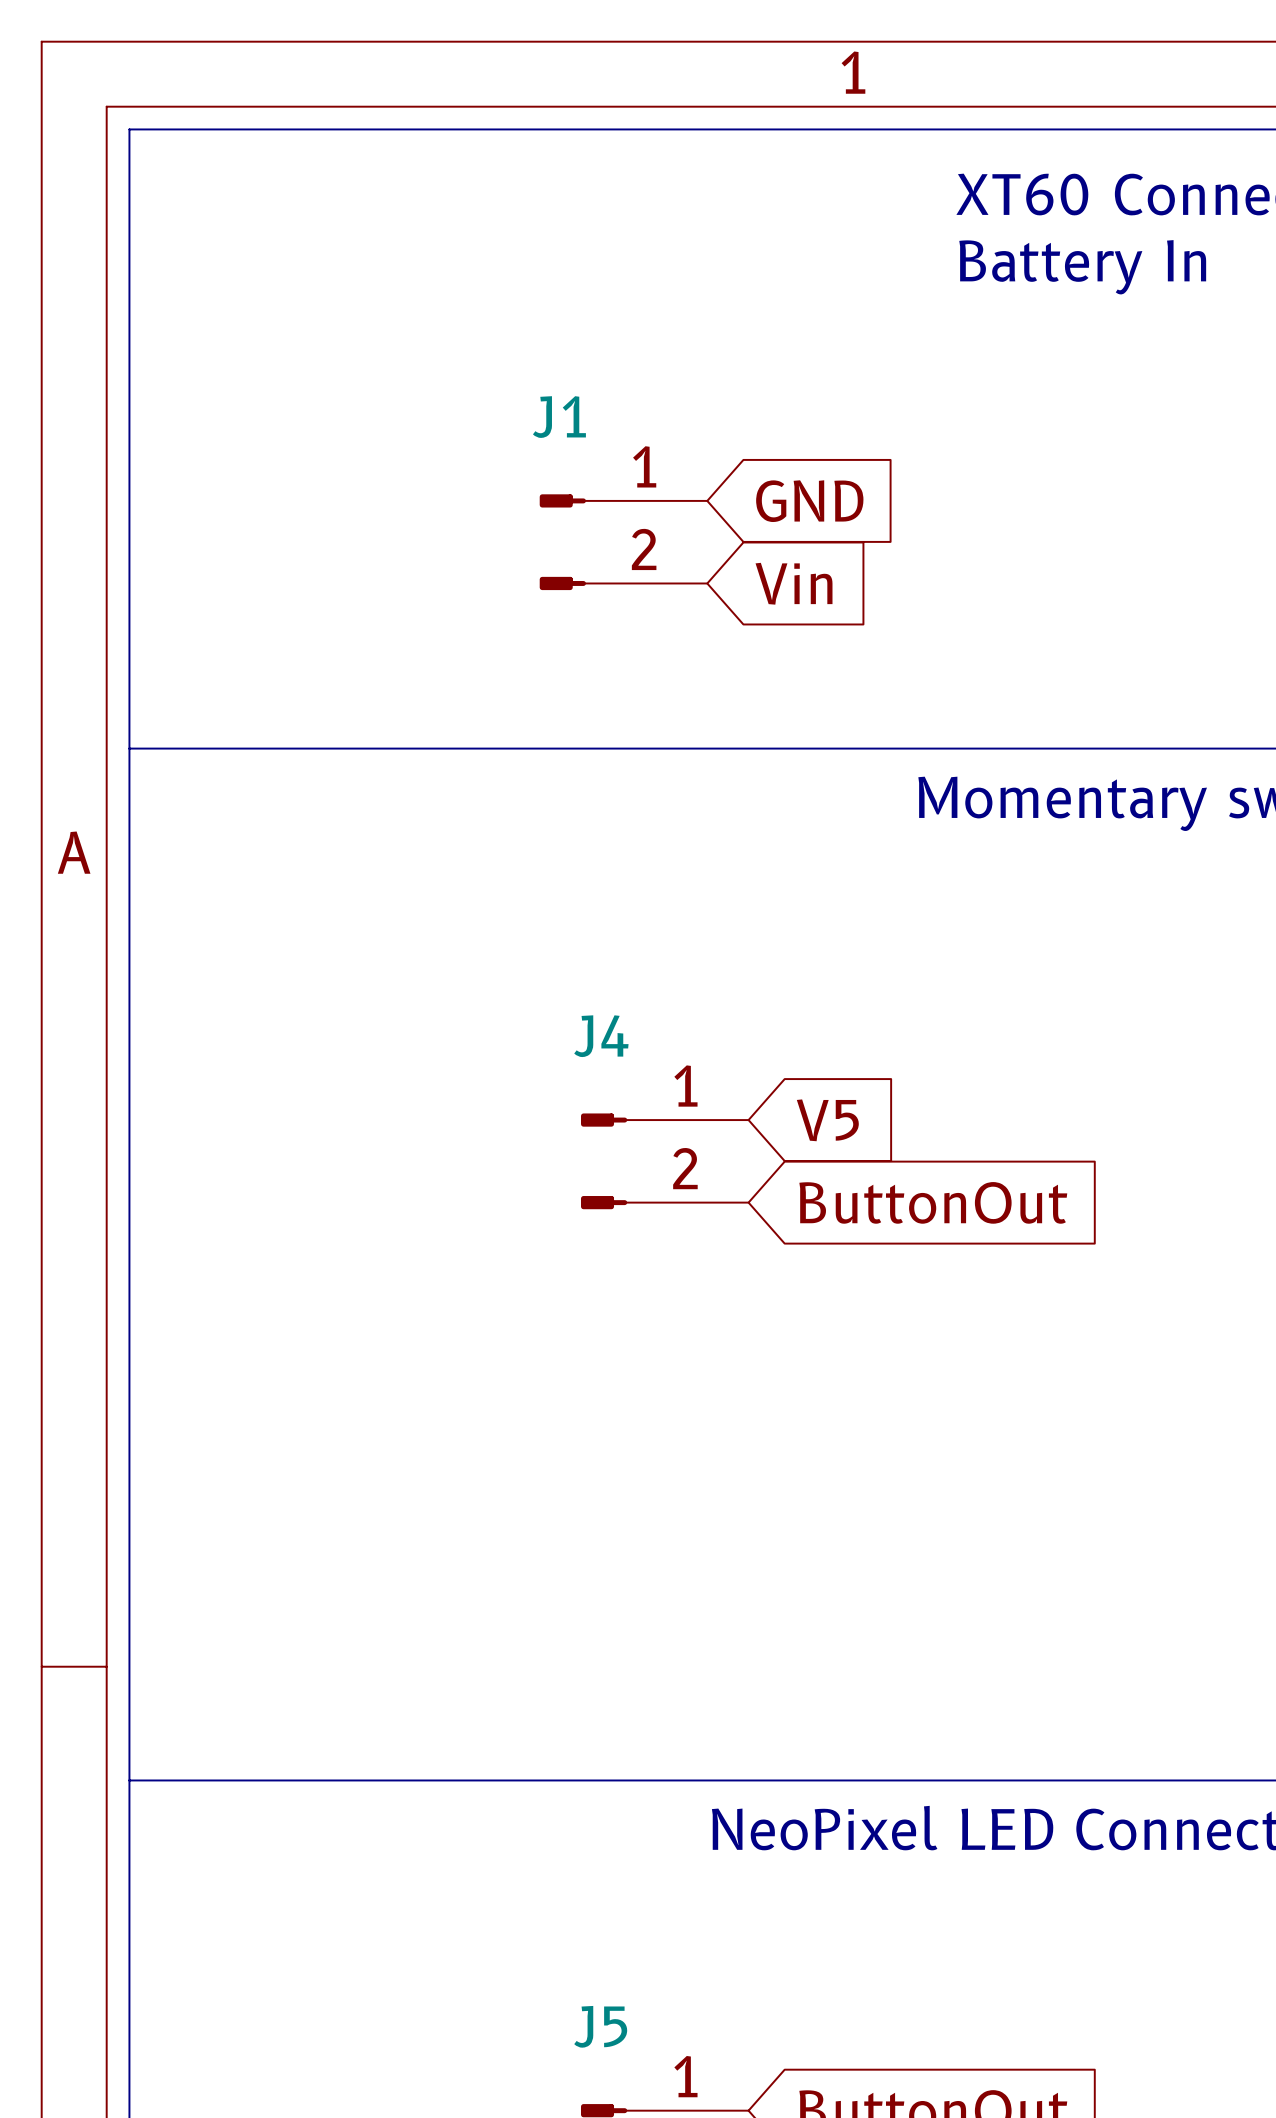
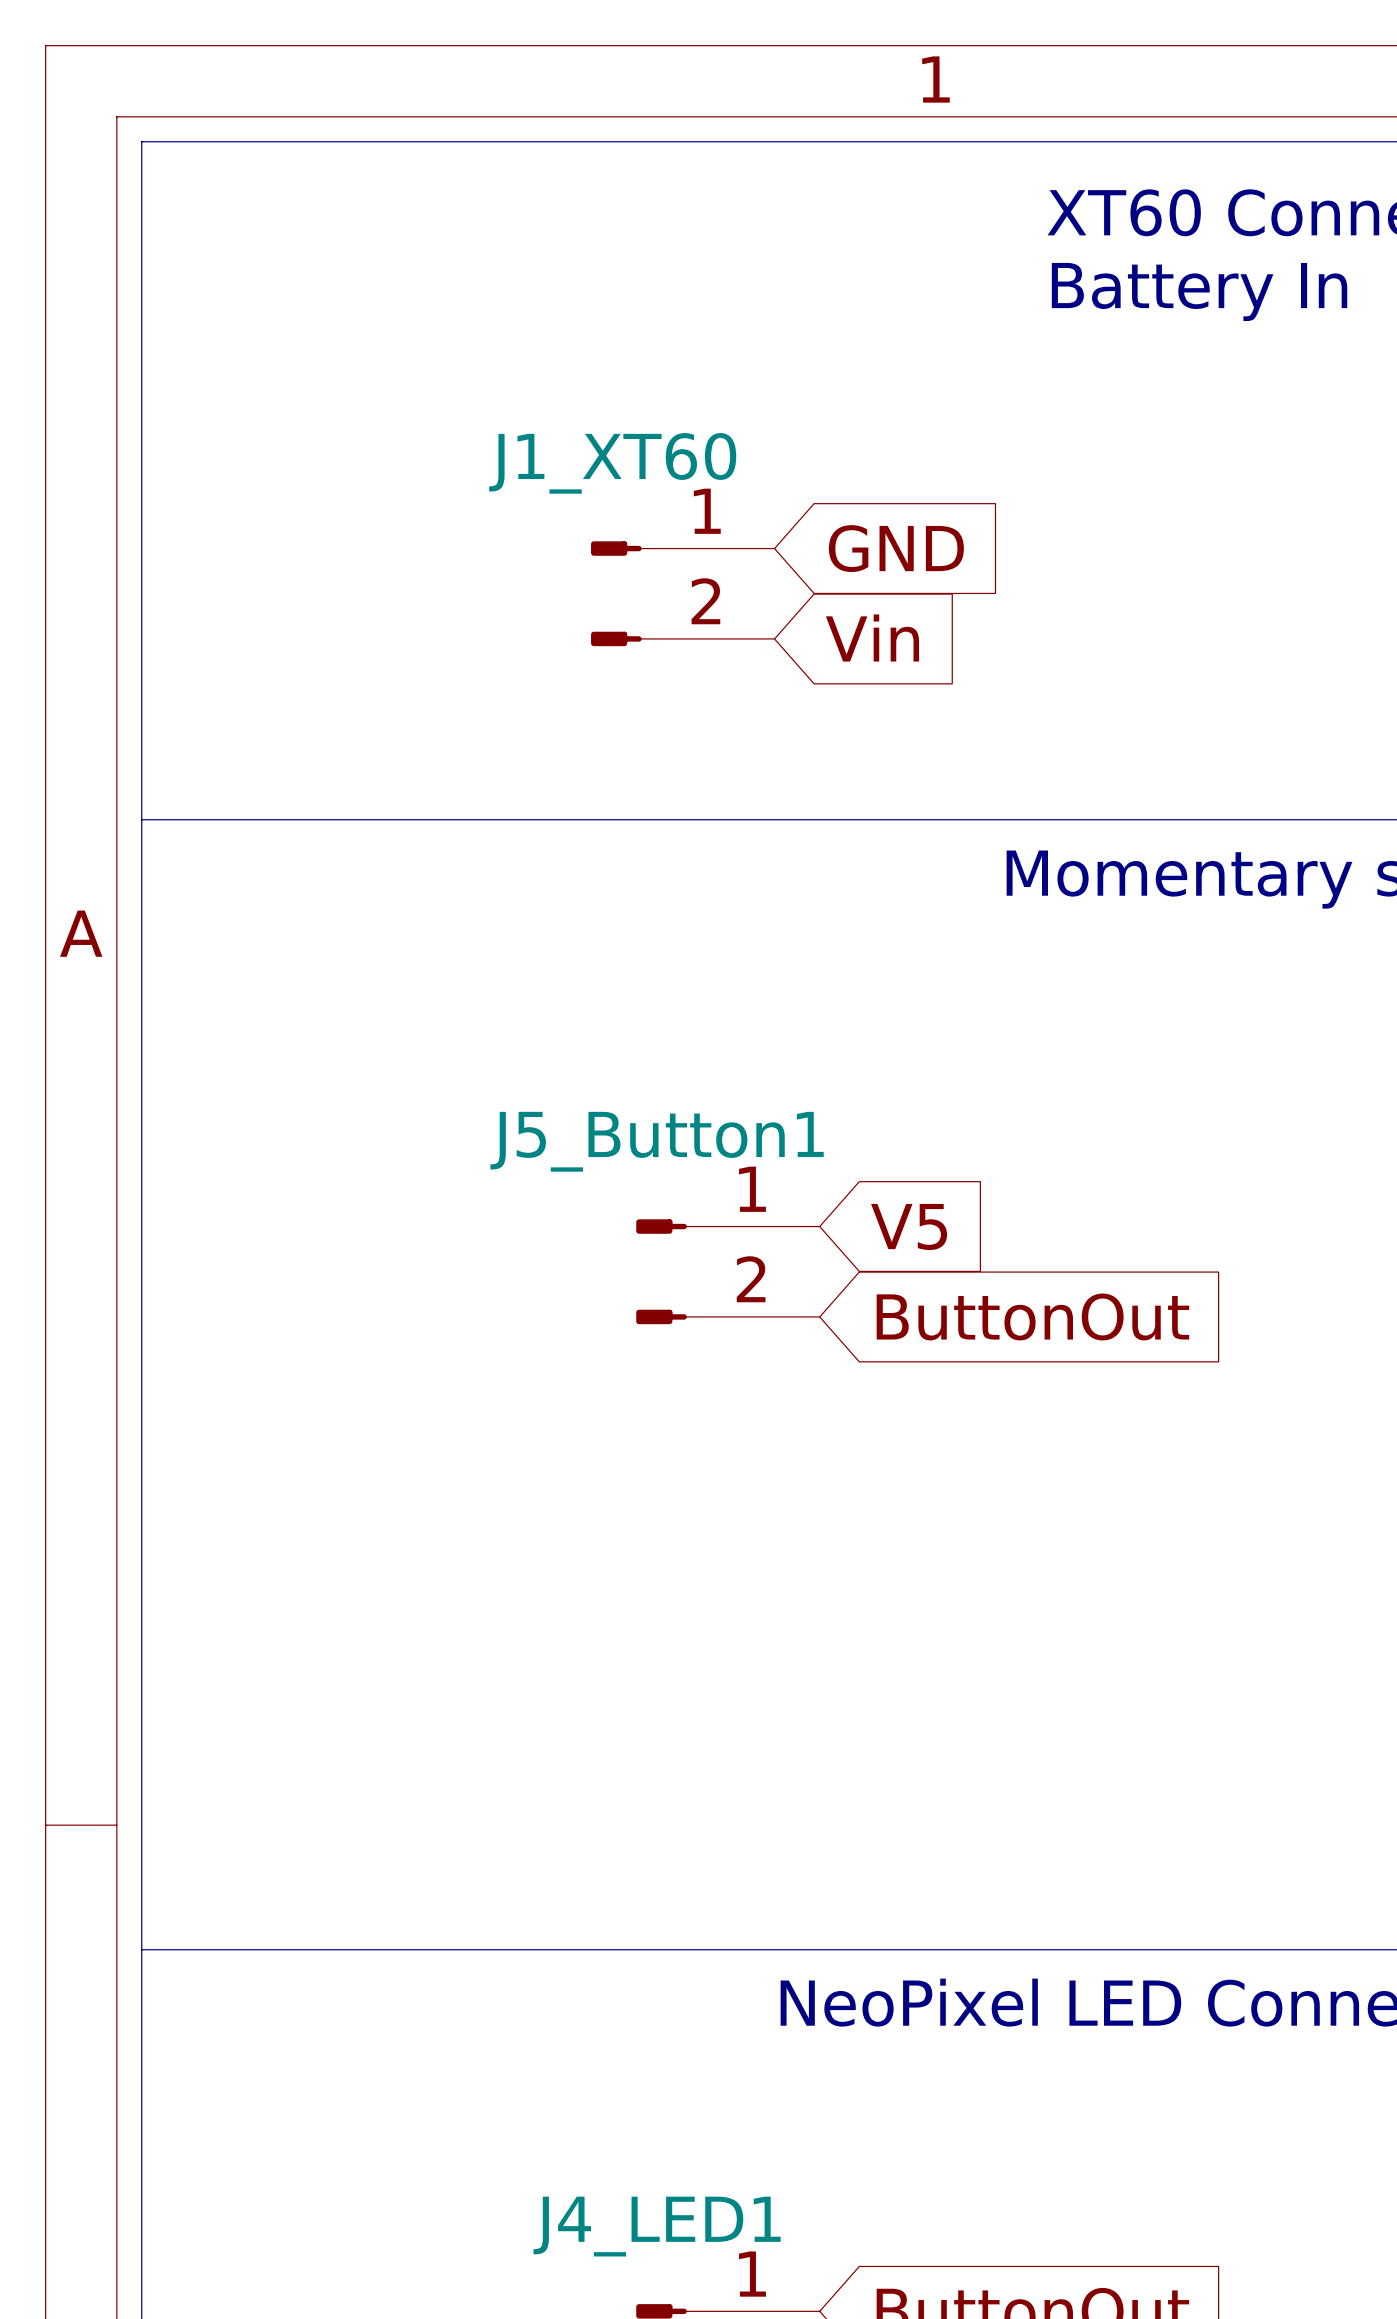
J1 name: J1 (559, 417) -> J1_XT60 (612, 463)
J4 name: J4 (601, 1036) -> J5_Button1 (657, 1141)
J5 name: J5 (600, 2026) -> J4_LED1 (657, 2226)

